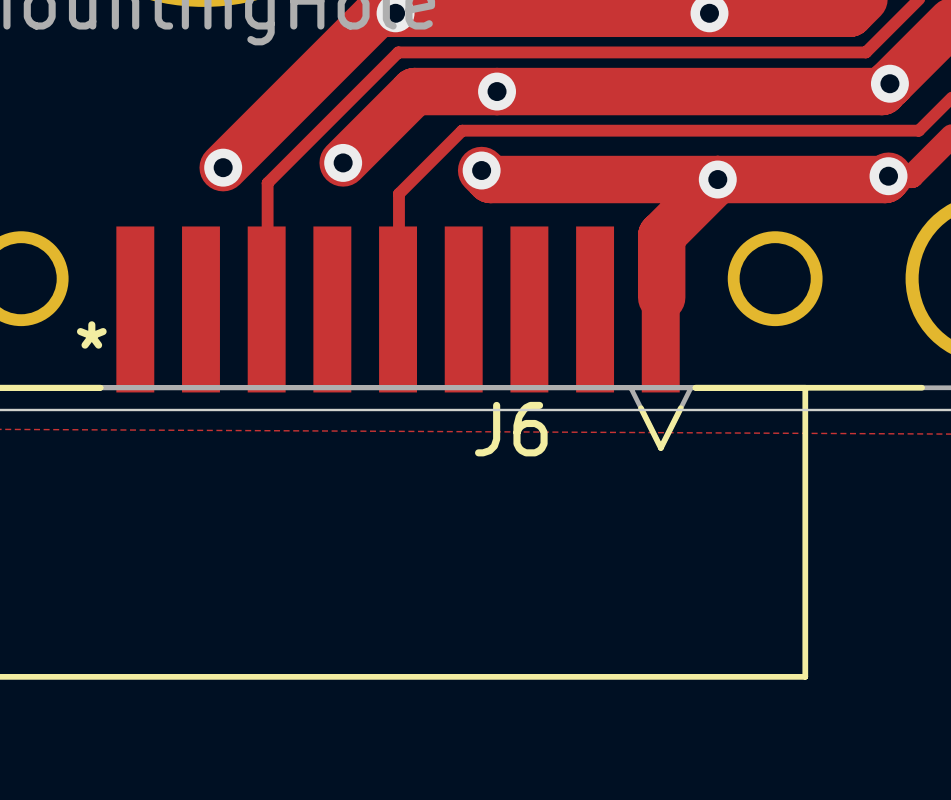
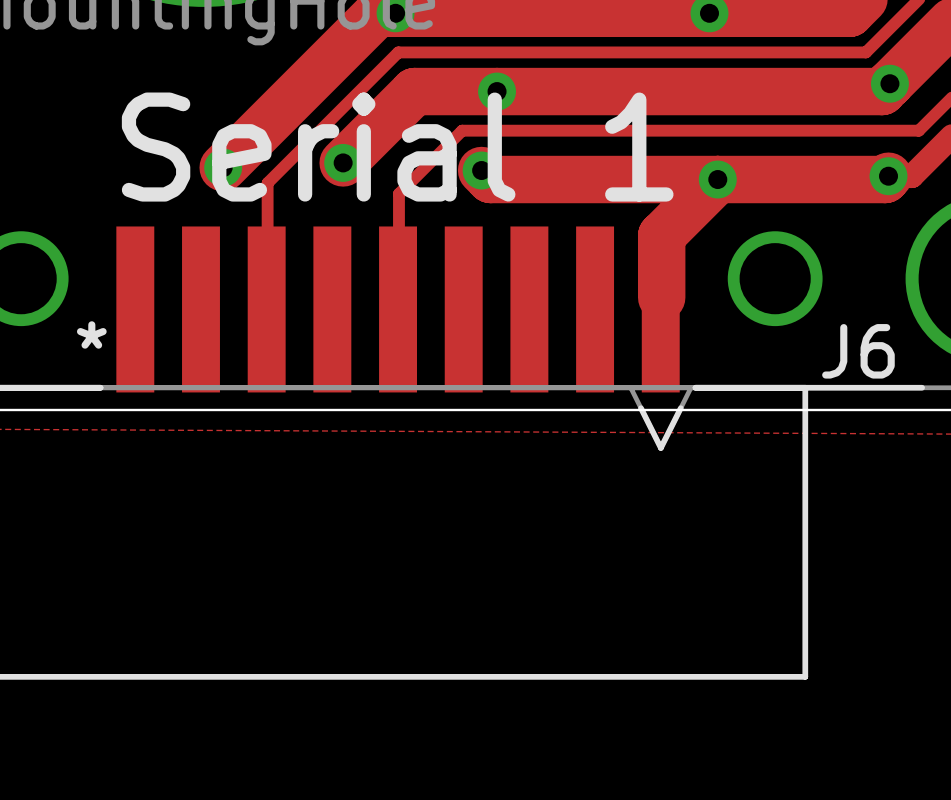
text: none -> Serial 1 (397, 147)
J6 name position: J6 (511, 429) -> J6 (858, 351)

